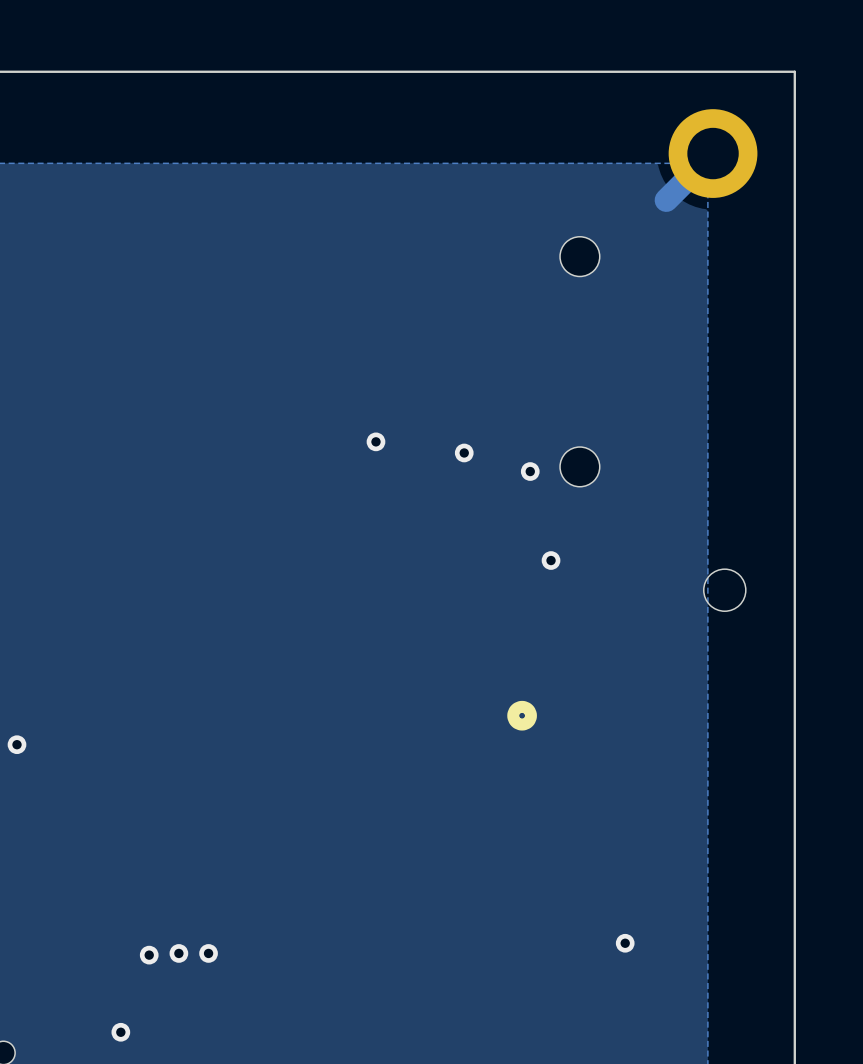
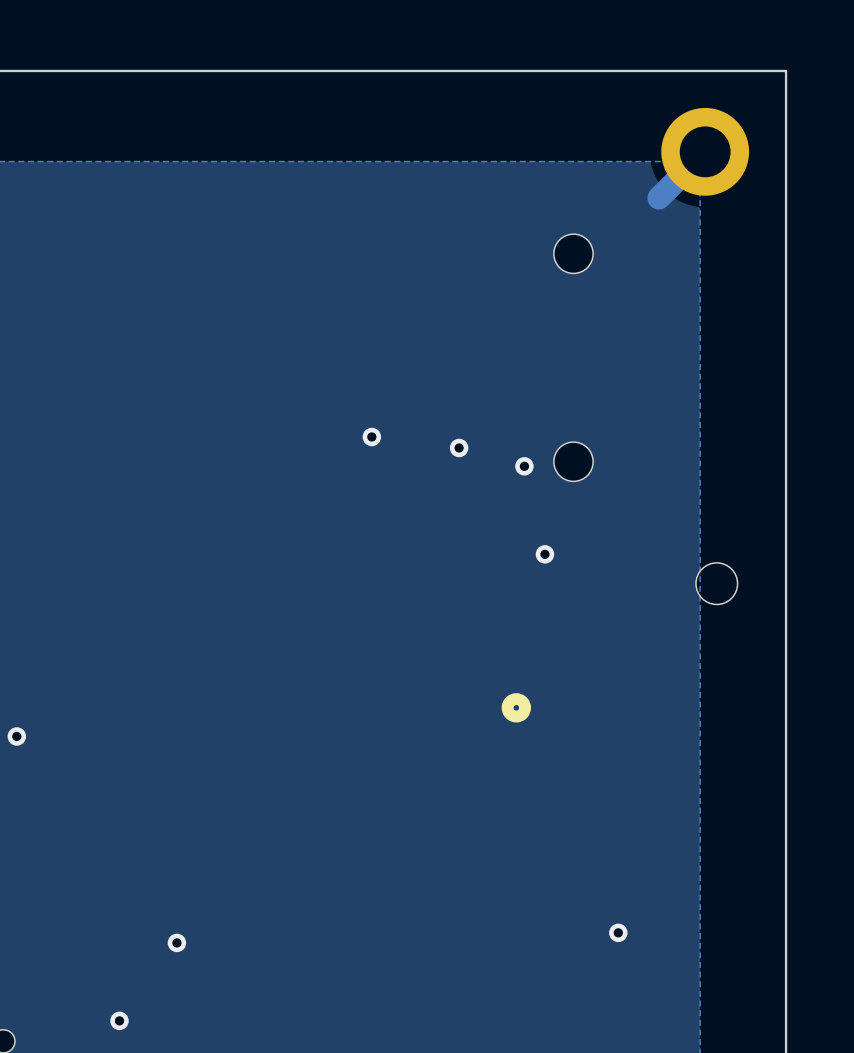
via: (208, 953) -> none
via: (149, 955) -> none

